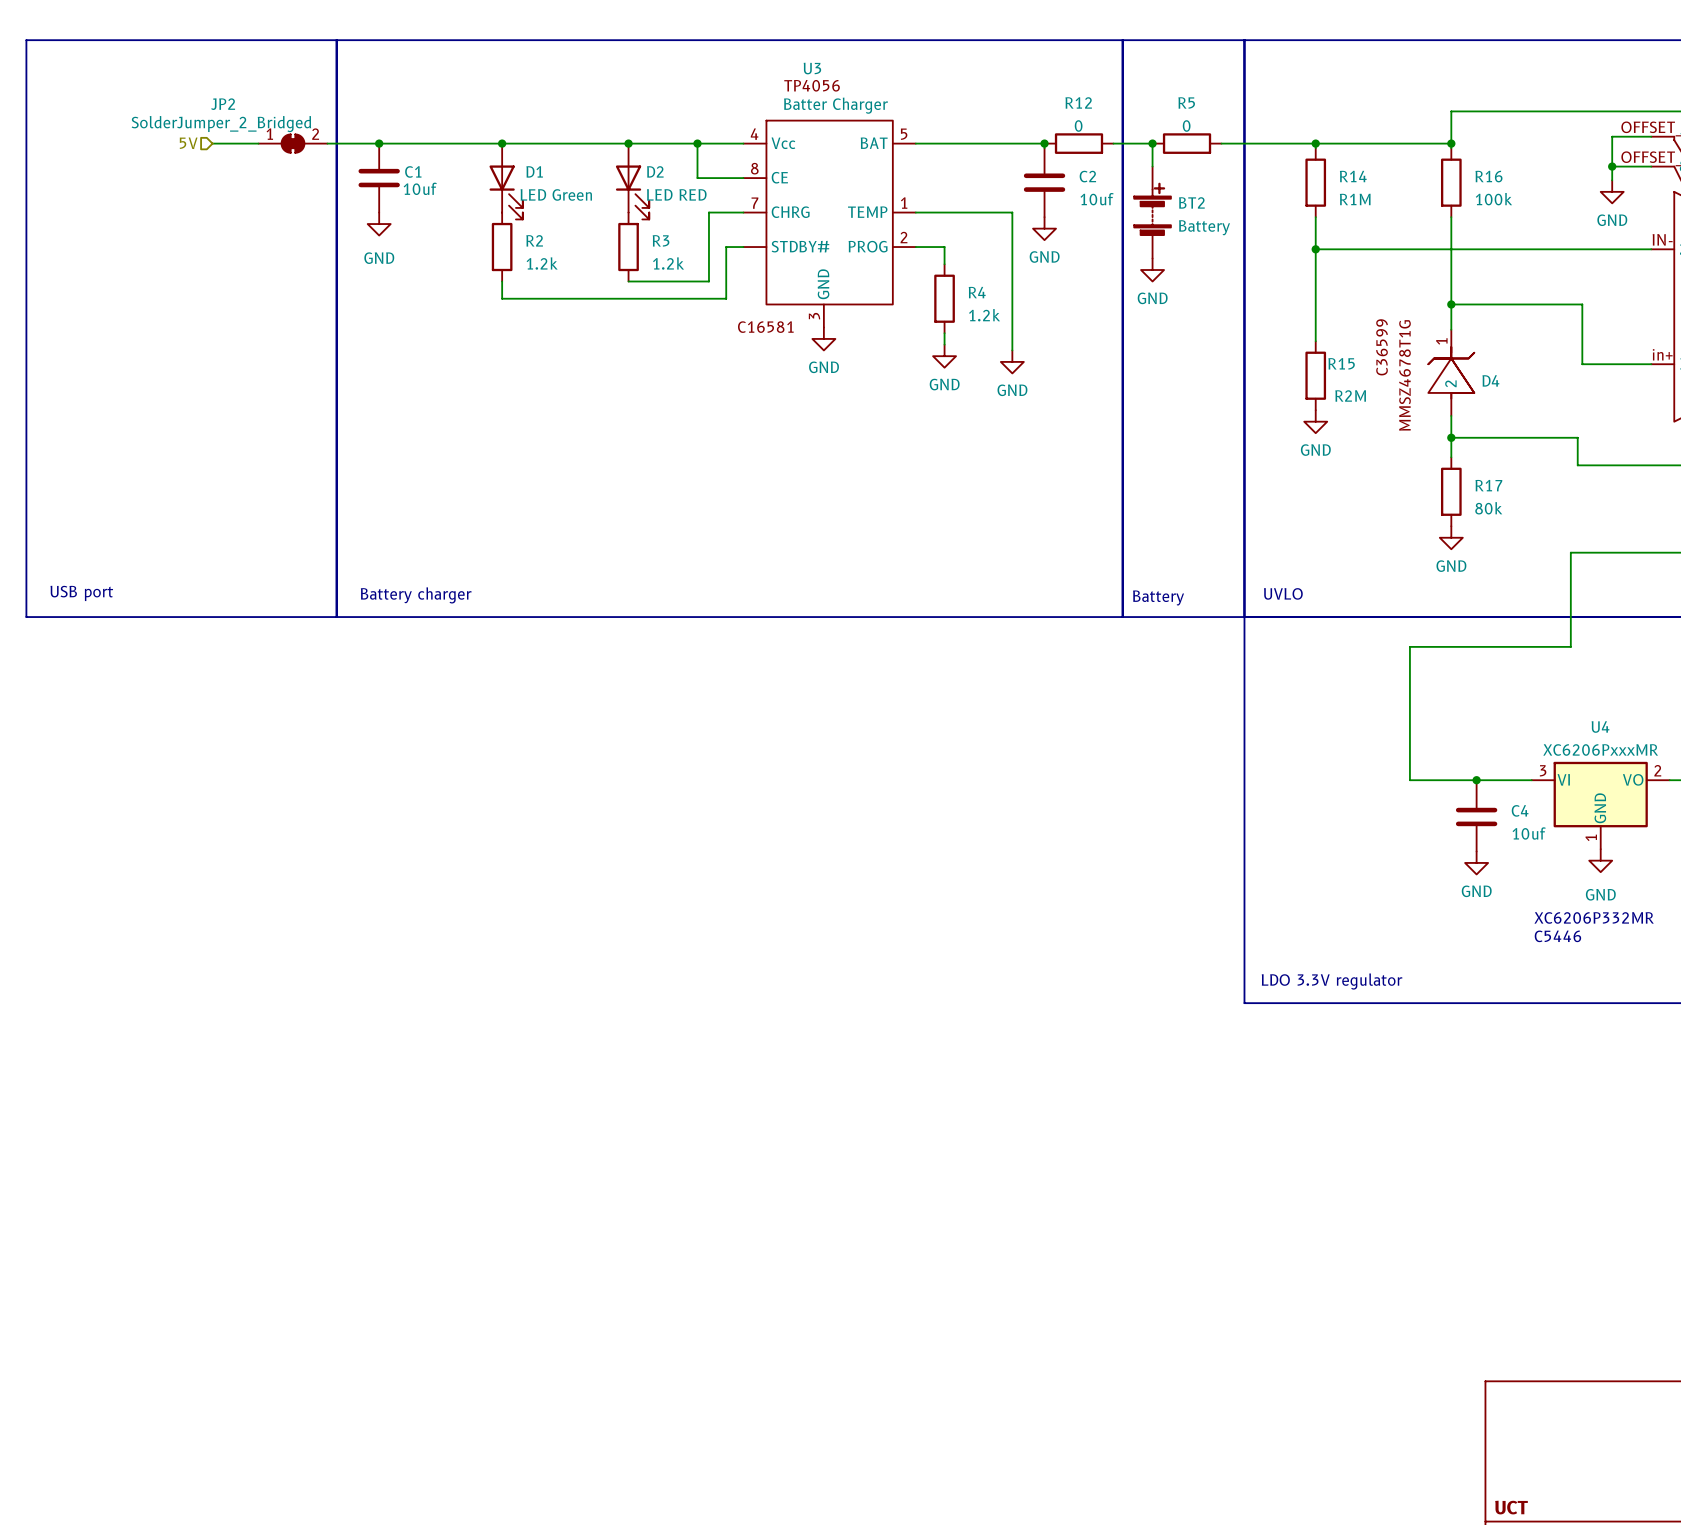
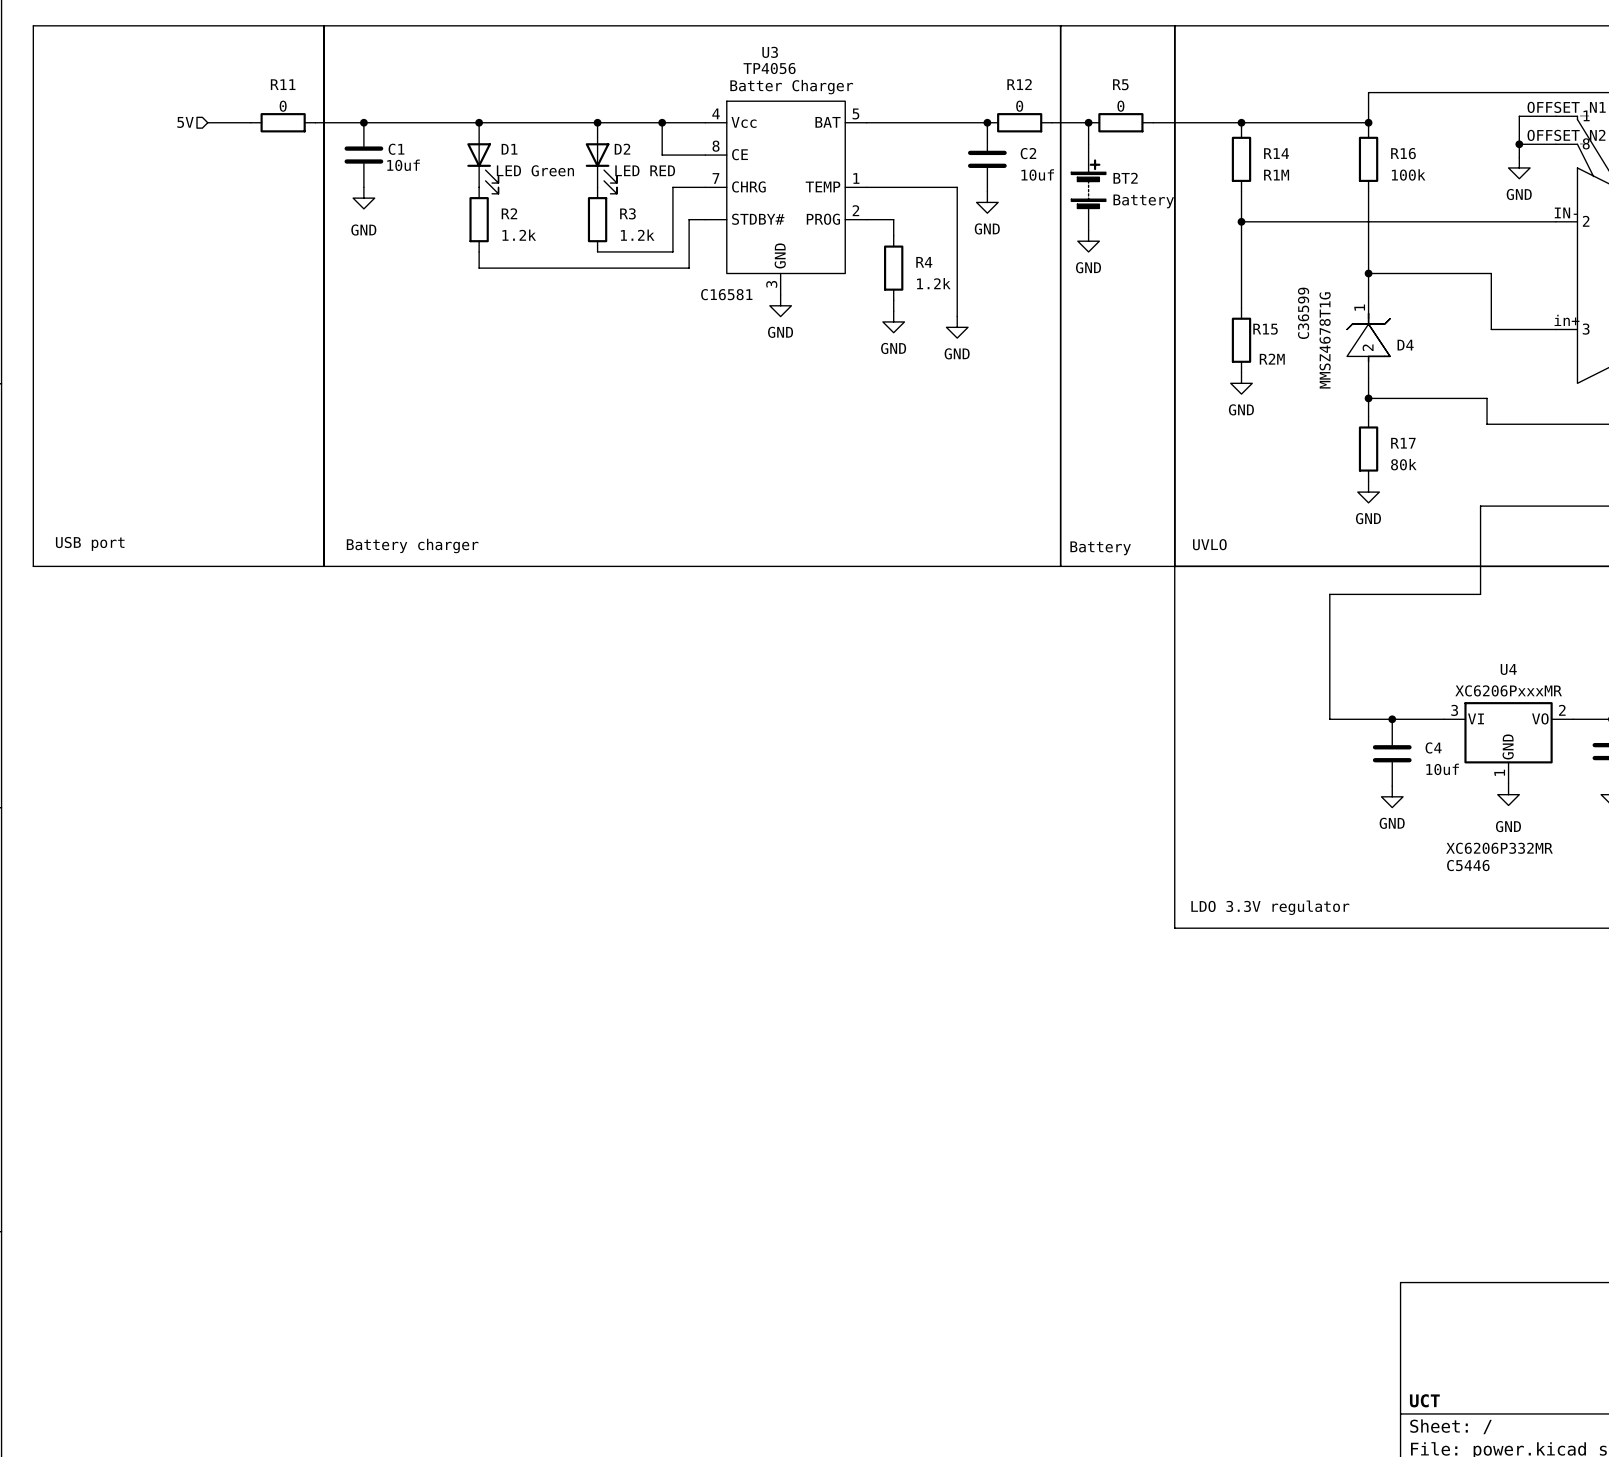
JP2: SolderJumper_2_Bridged (293, 143) -> none
R11: none -> 0 (283, 122)

